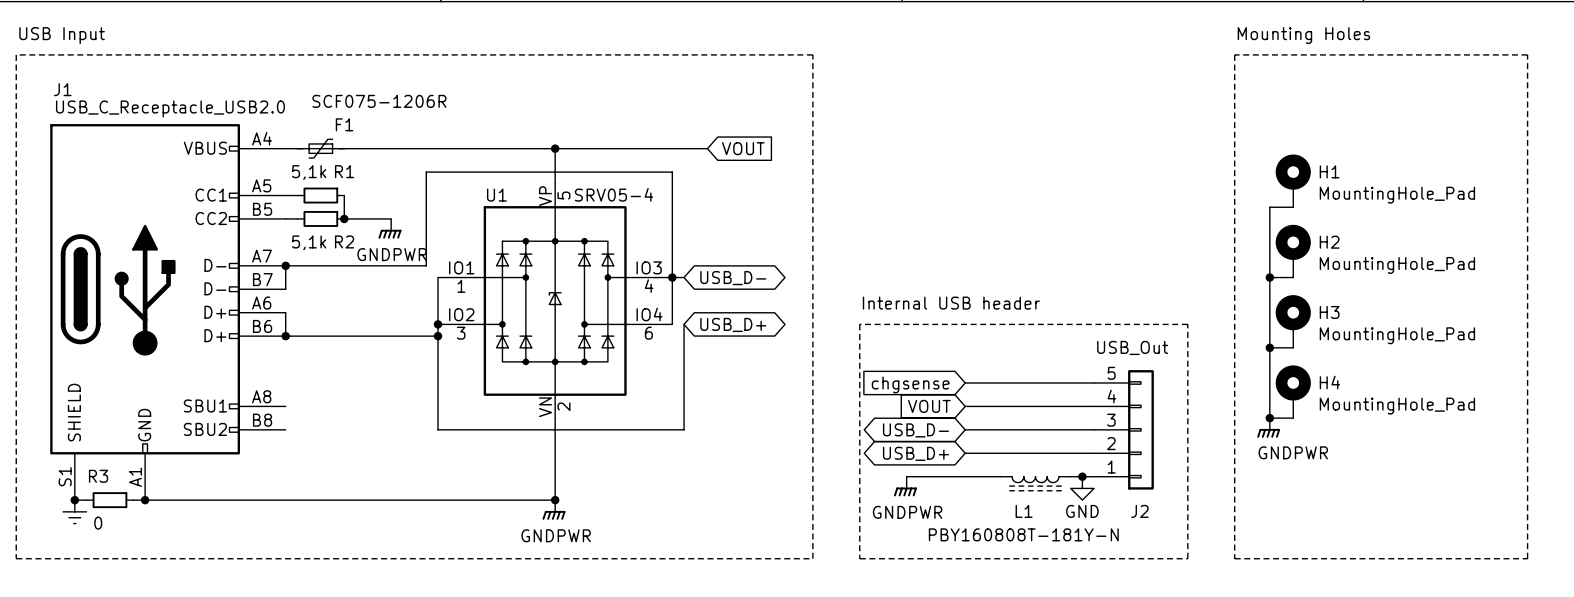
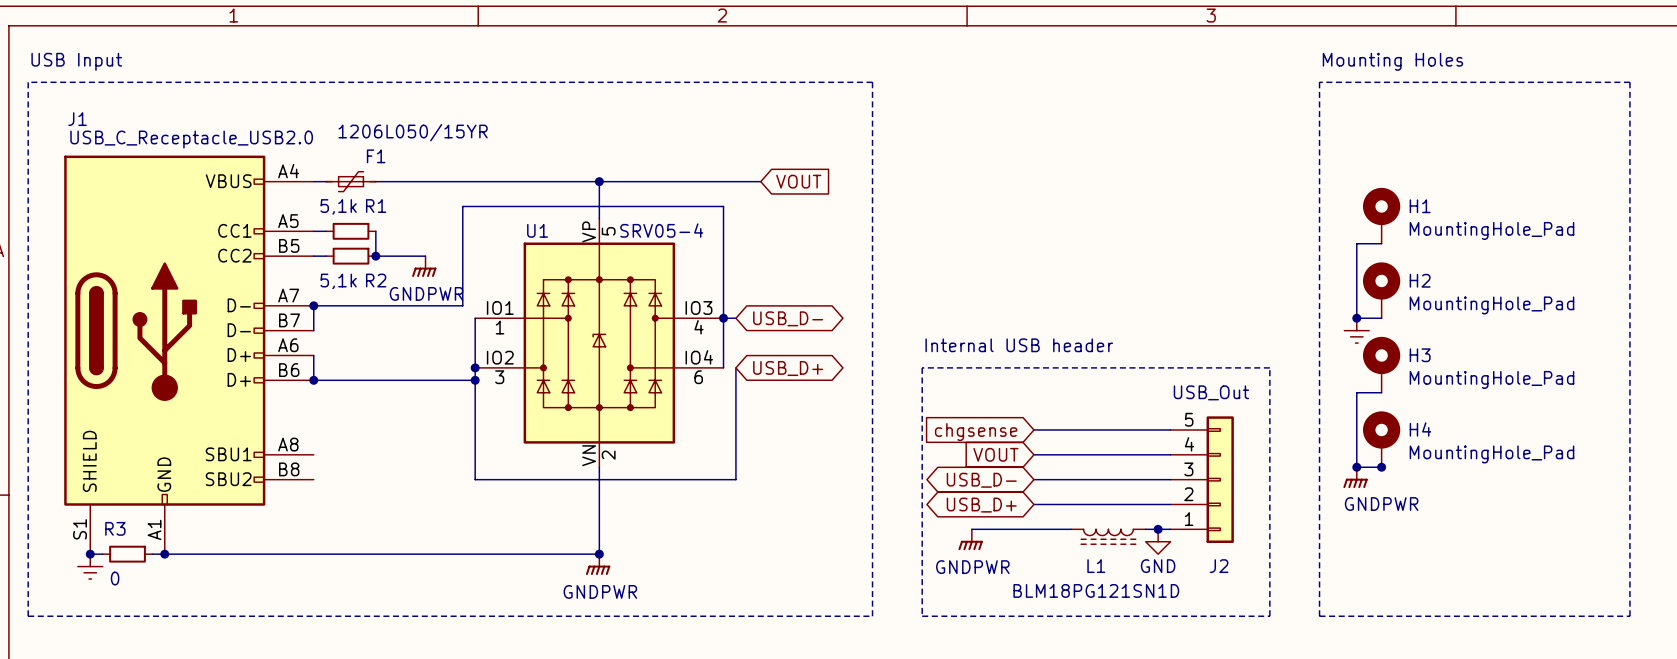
F1 value: SCF075-1206R (379, 101) -> 1206L050/15YR (413, 132)
wire: (1269, 277) (1269, 347) -> none
power symbol: none -> (1356, 330)
junction: (1269, 347) -> none
junction: none -> (1381, 467)
L1 value: PBY160808T-181Y-N (1023, 534) -> BLM18PG121SN1D (1096, 590)

